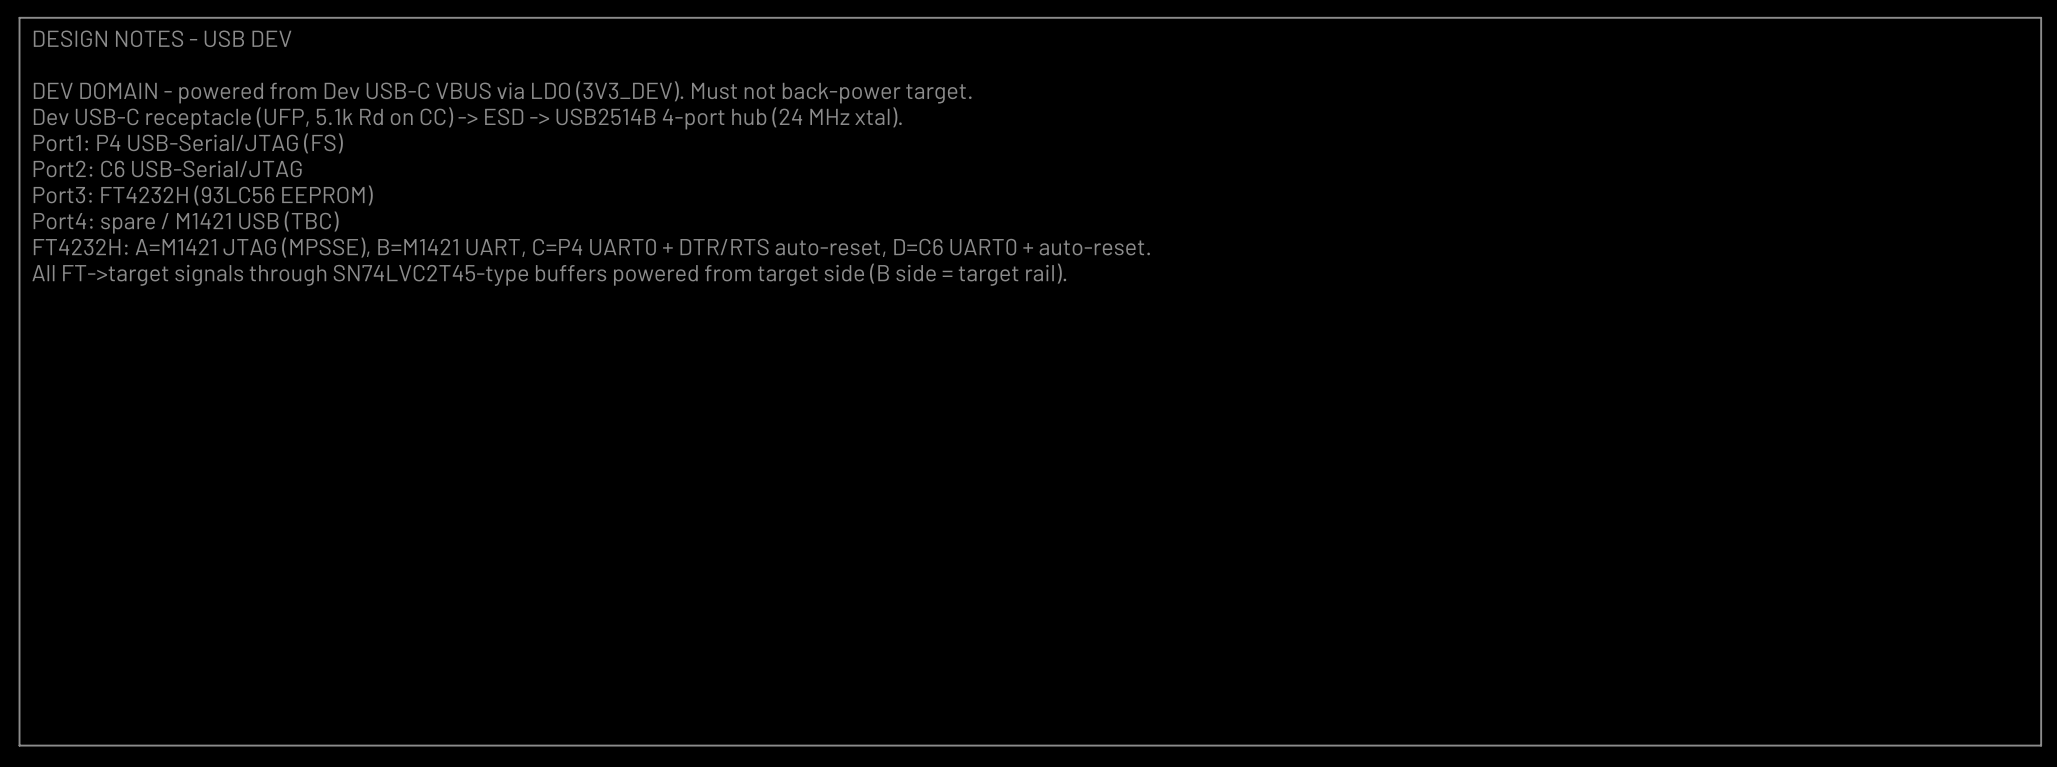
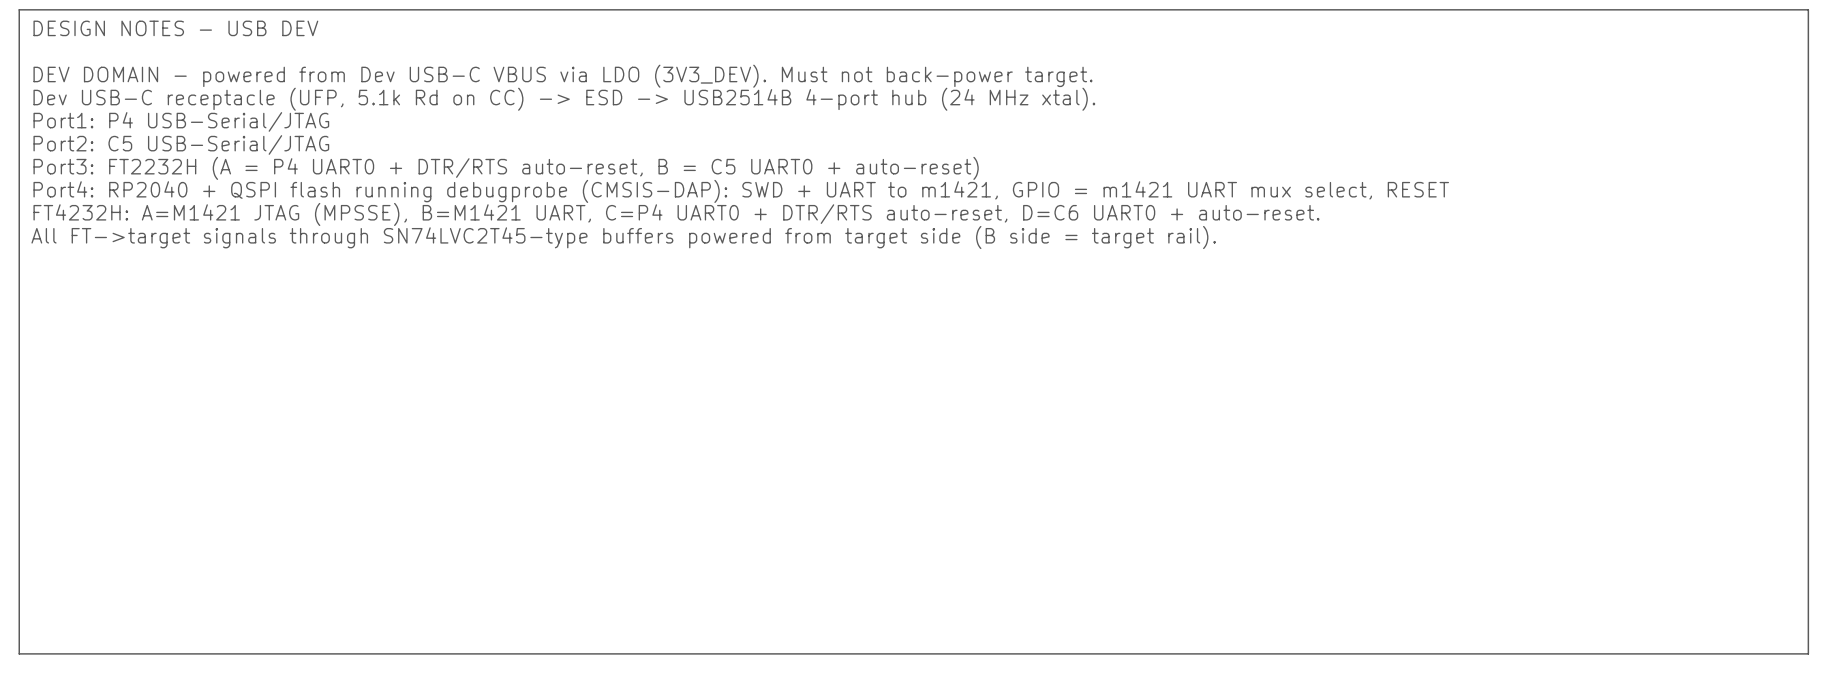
text: Port1: P4 USB-Serial/JTAG (FS) (188, 143) -> Port1: P4 USB-Serial/JTAG (181, 121)
text: Port2: C6 USB-Serial/JTAG (167, 168) -> Port2: C5 USB-Serial/JTAG (181, 144)
text: Port3: FT4232H (93LC56 EEPROM) (203, 195) -> Port3: FT2232H (A = P4 UART0 + DTR/RTS auto-reset, B = C5 UART0 + auto-reset) (506, 168)
text: Port4: spare / M1421 USB (TBC) (186, 222) -> Port4: RP2040 + QSPI flash running debugprobe (CMSIS-DAP): SWD + UART to m1421, GPIO = m1421 UART mux select, RESET (741, 191)

